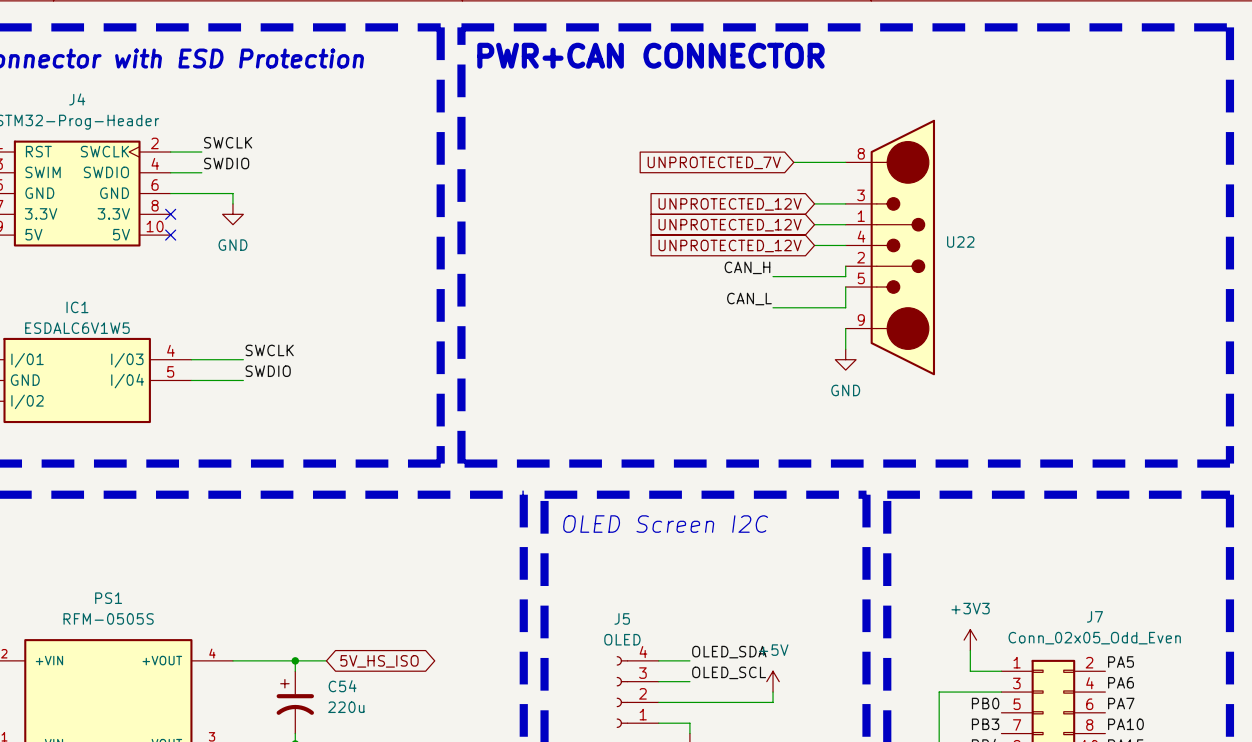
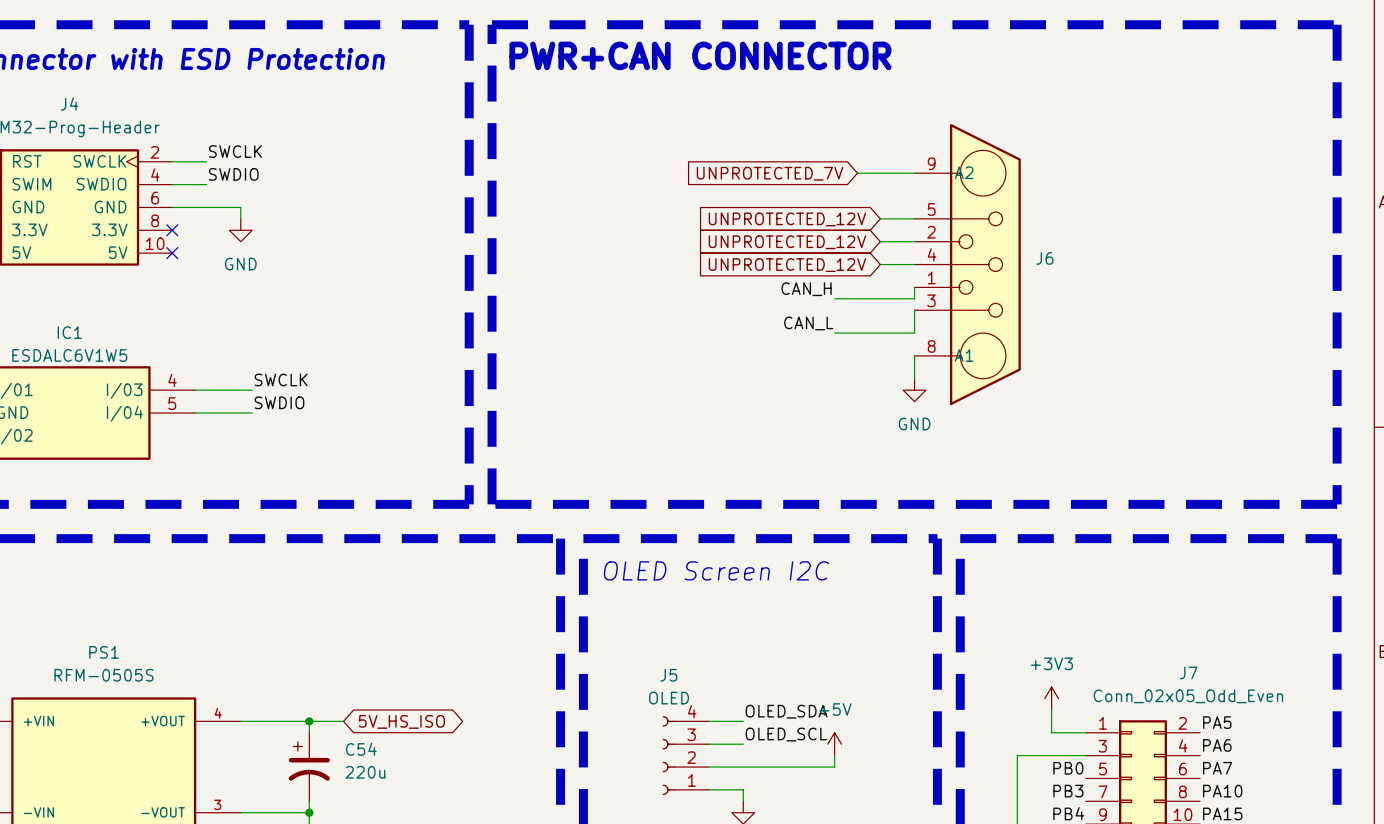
J6: none -> (967, 264)
U22: (890, 247) -> none

